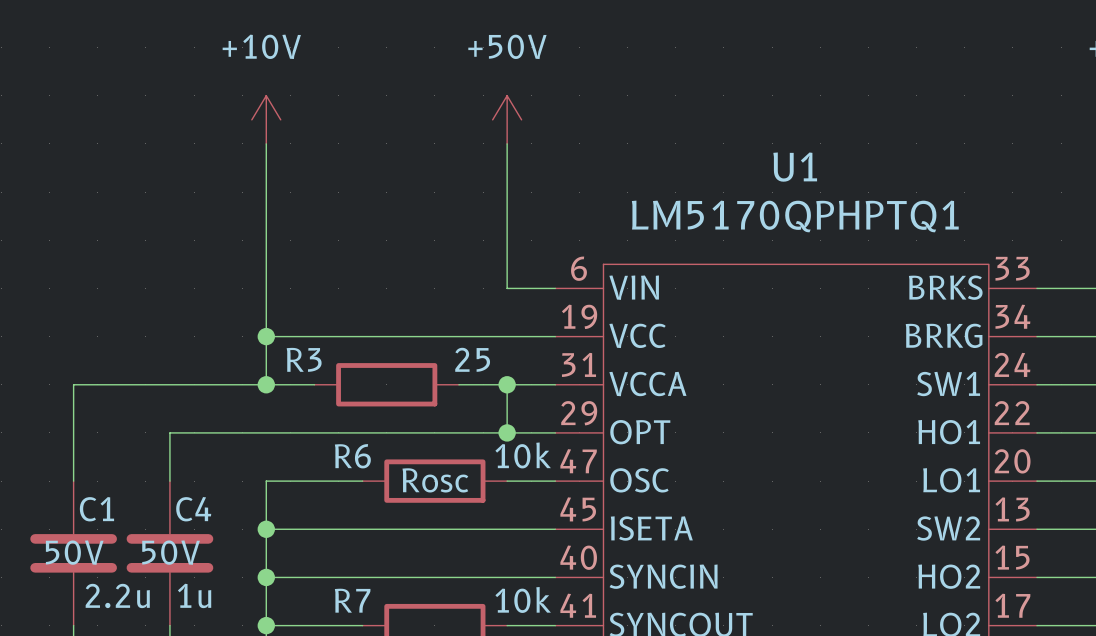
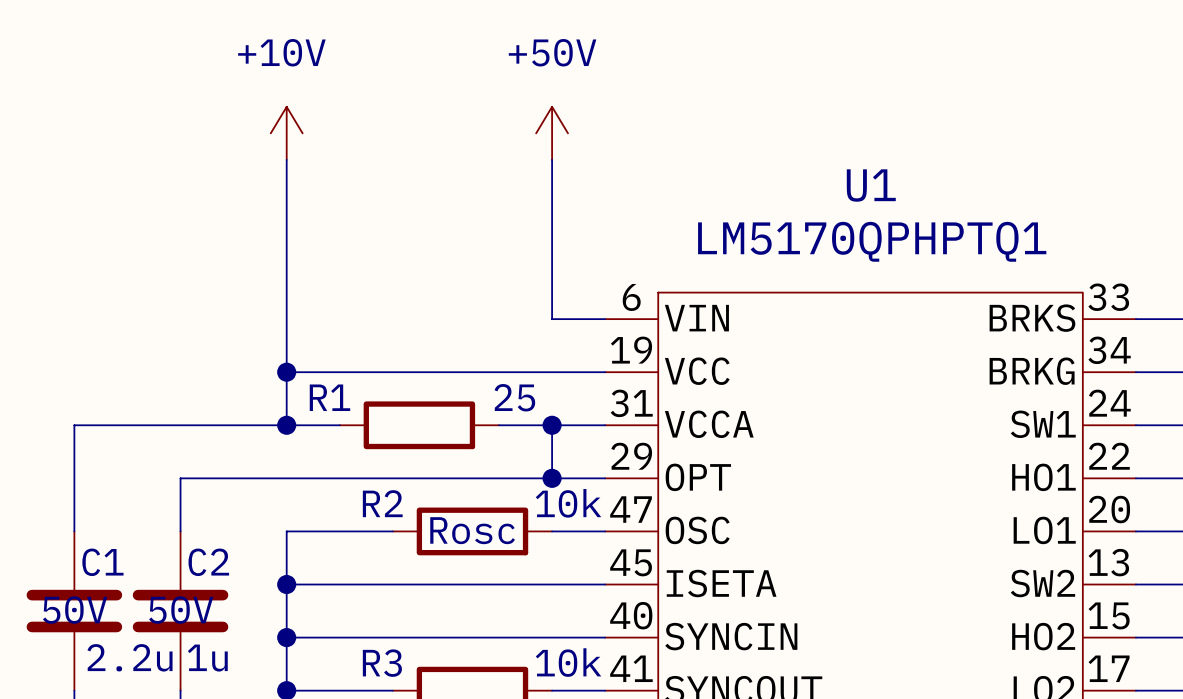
R3 name: R3 (304, 359) -> R1 (329, 397)
R6 name: R6 (352, 456) -> R2 (382, 503)
C4 name: C4 (193, 509) -> C2 (208, 562)
R7 name: R7 (352, 600) -> R3 (382, 663)

